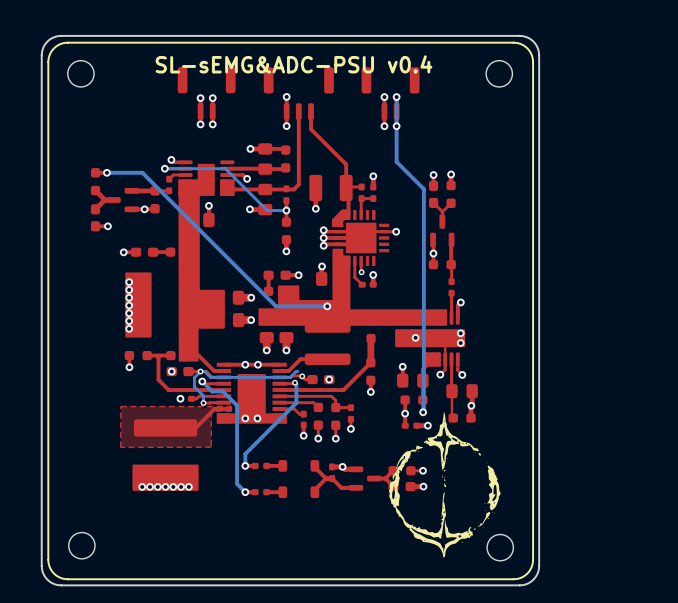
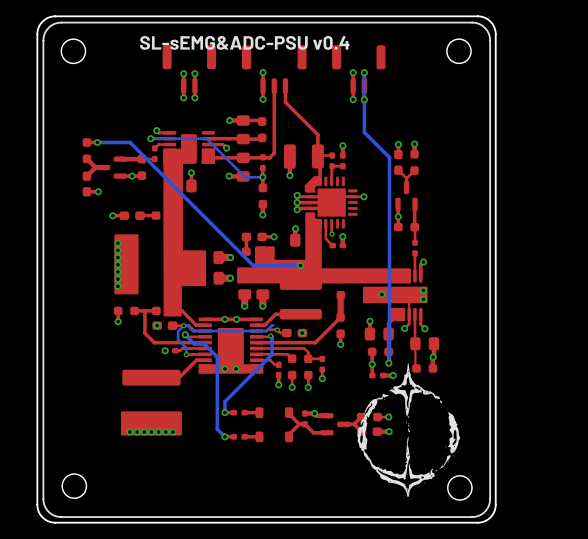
top zone outline: (231, 406) (231, 411) (211, 411) (211, 447) (120, 447) (120, 406) (231, 406) -> none

